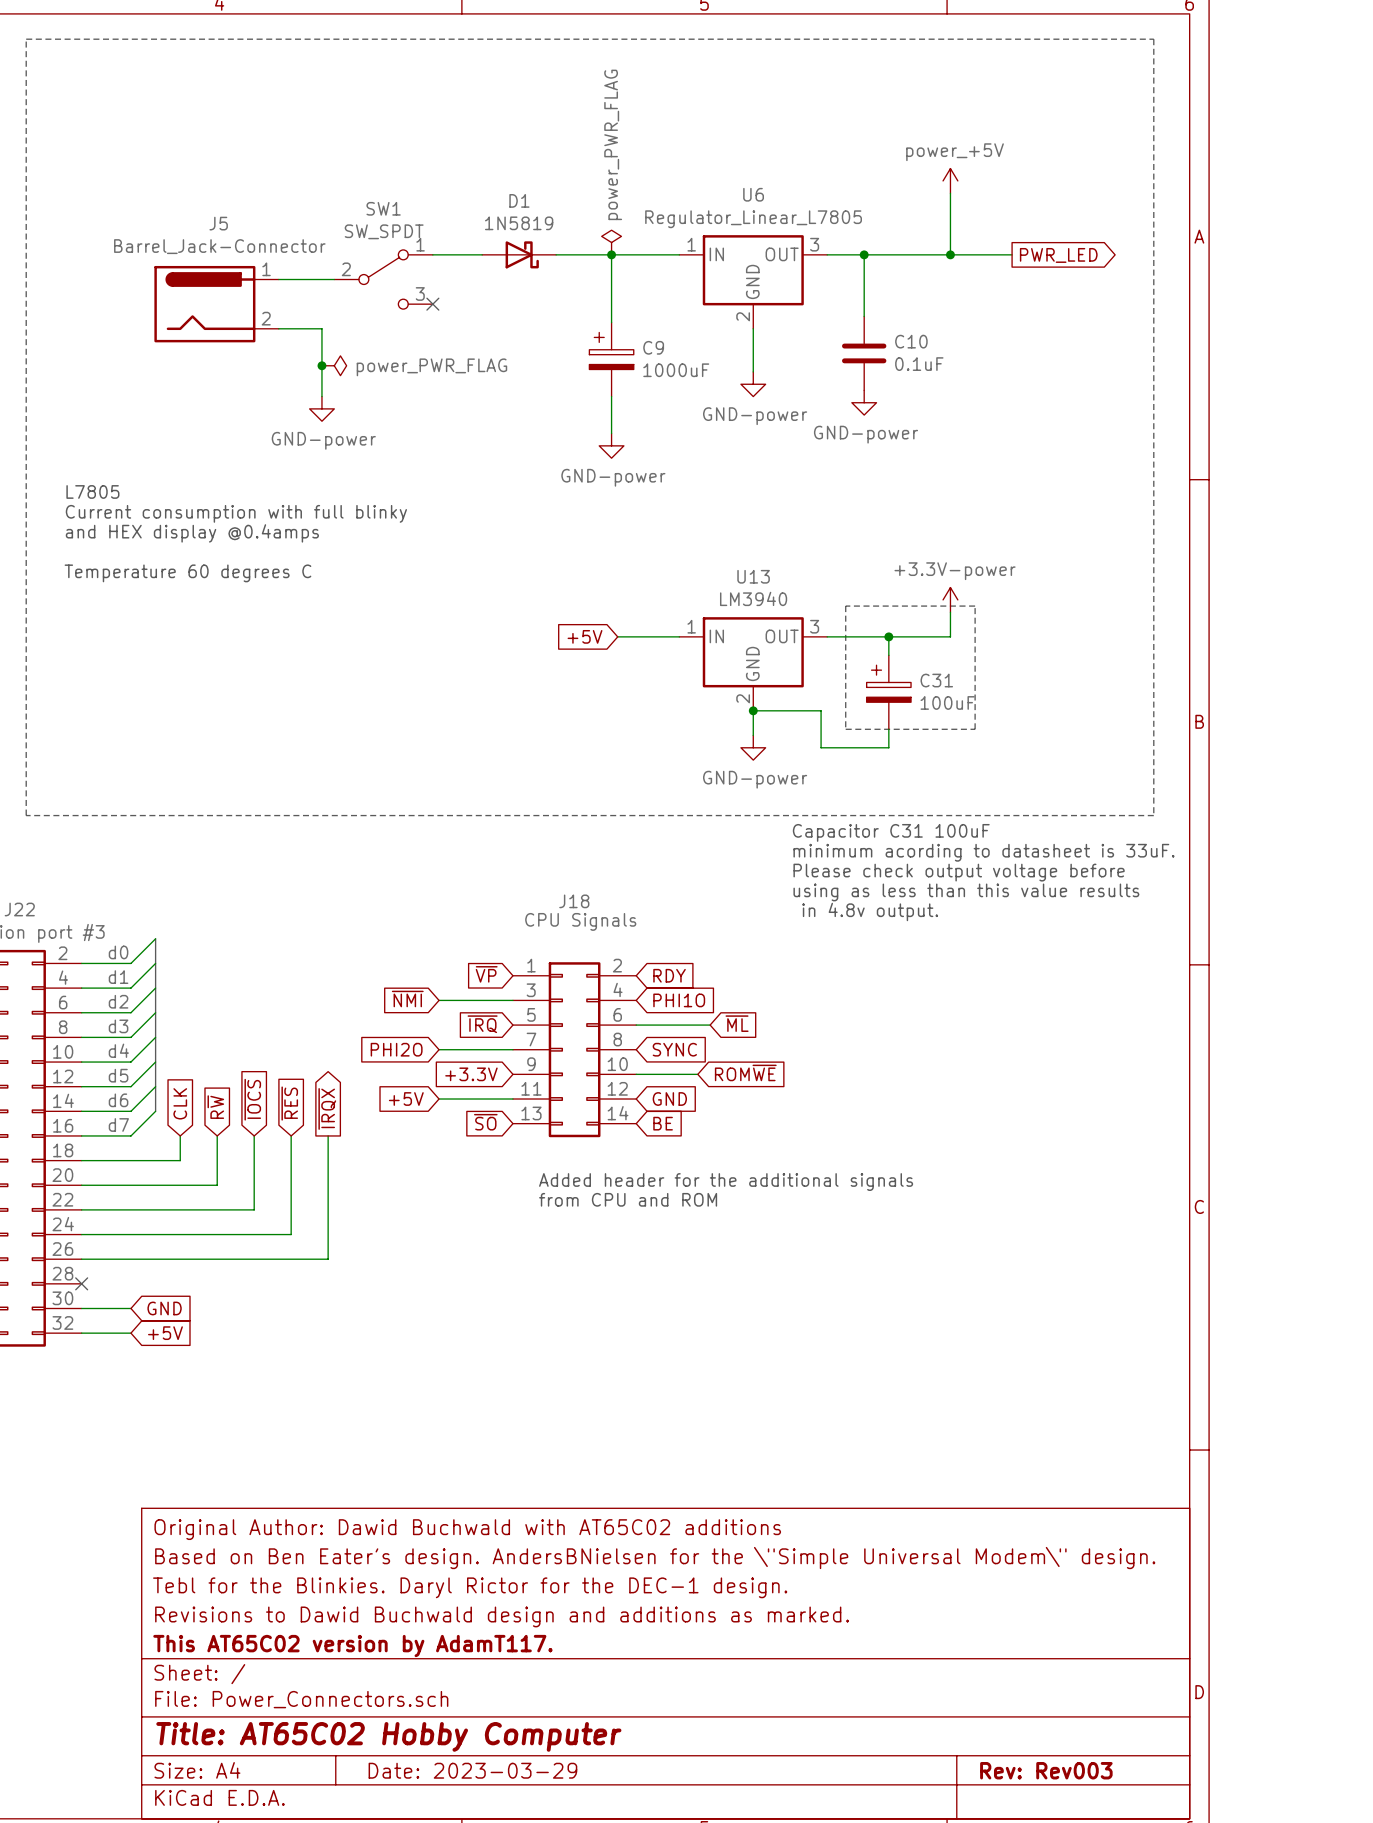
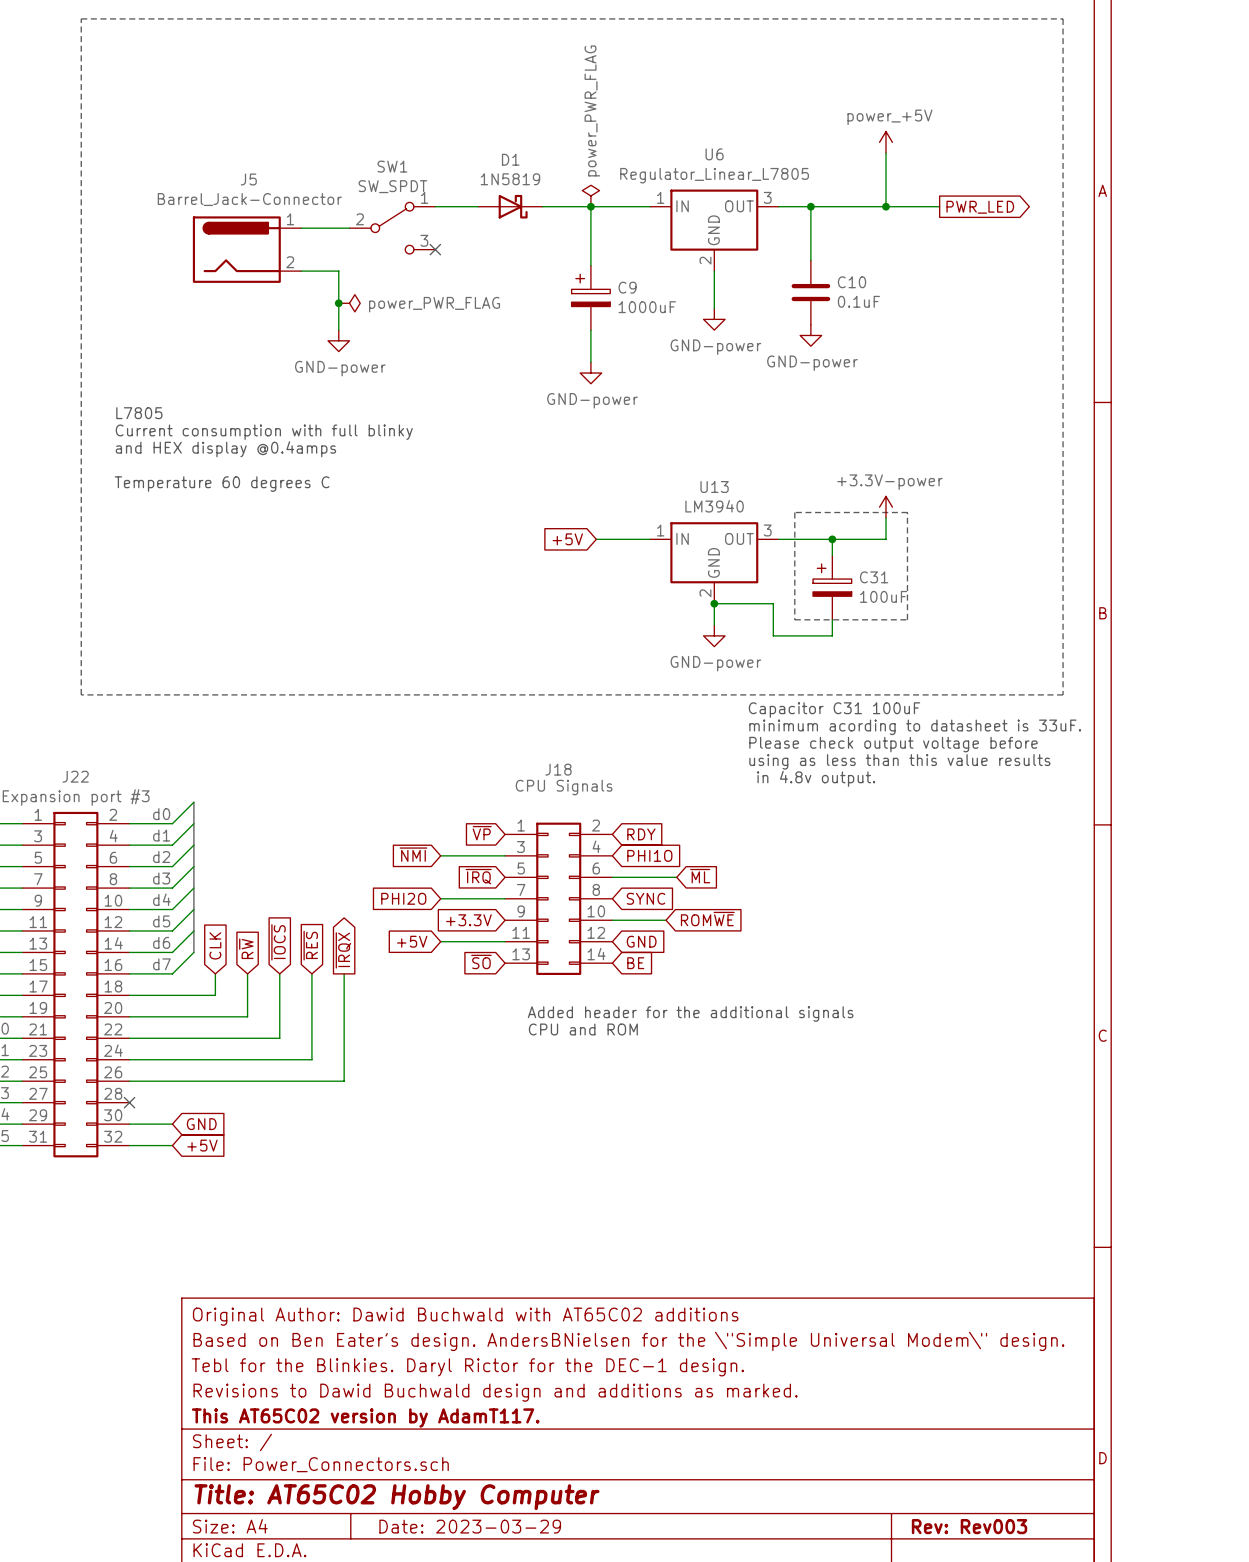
text: from CPU and ROM (628, 1199) -> CPU and ROM (583, 1029)

